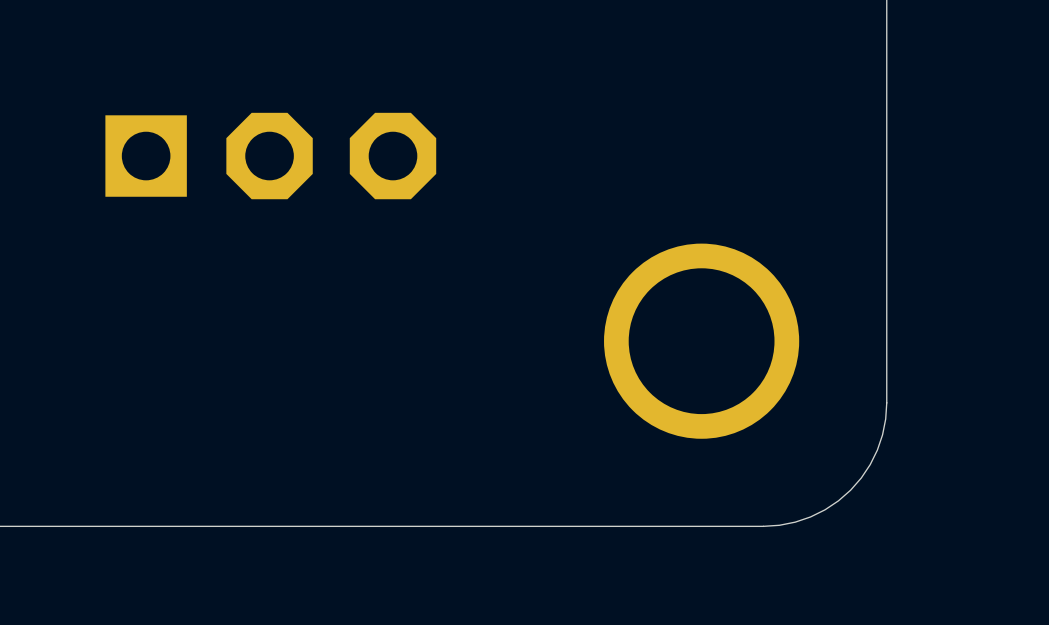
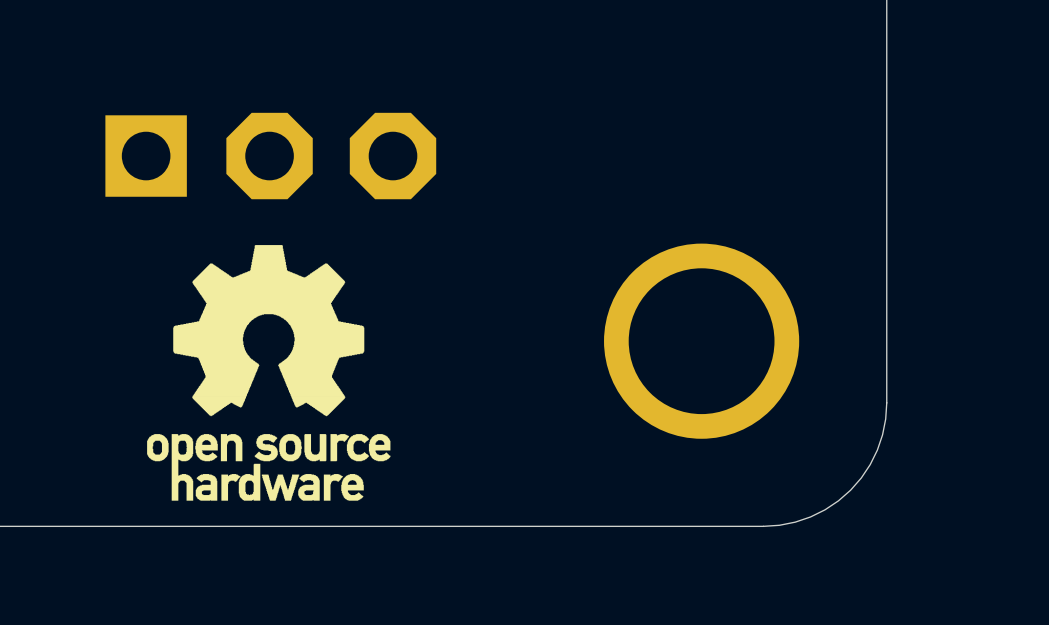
drawing: none -> [147, 245, 391, 501]

